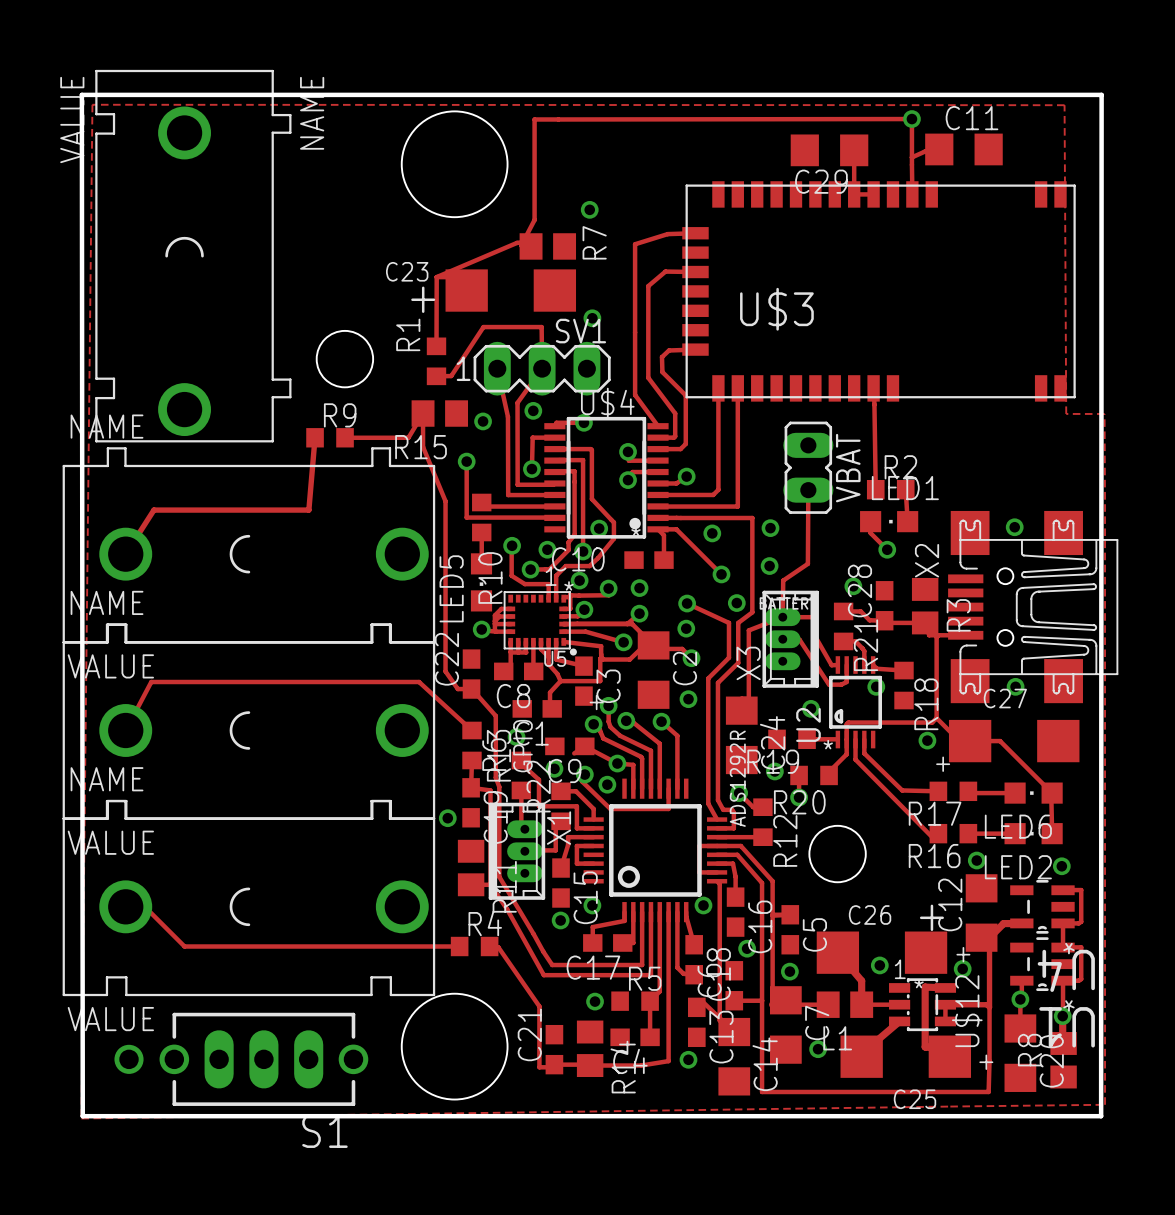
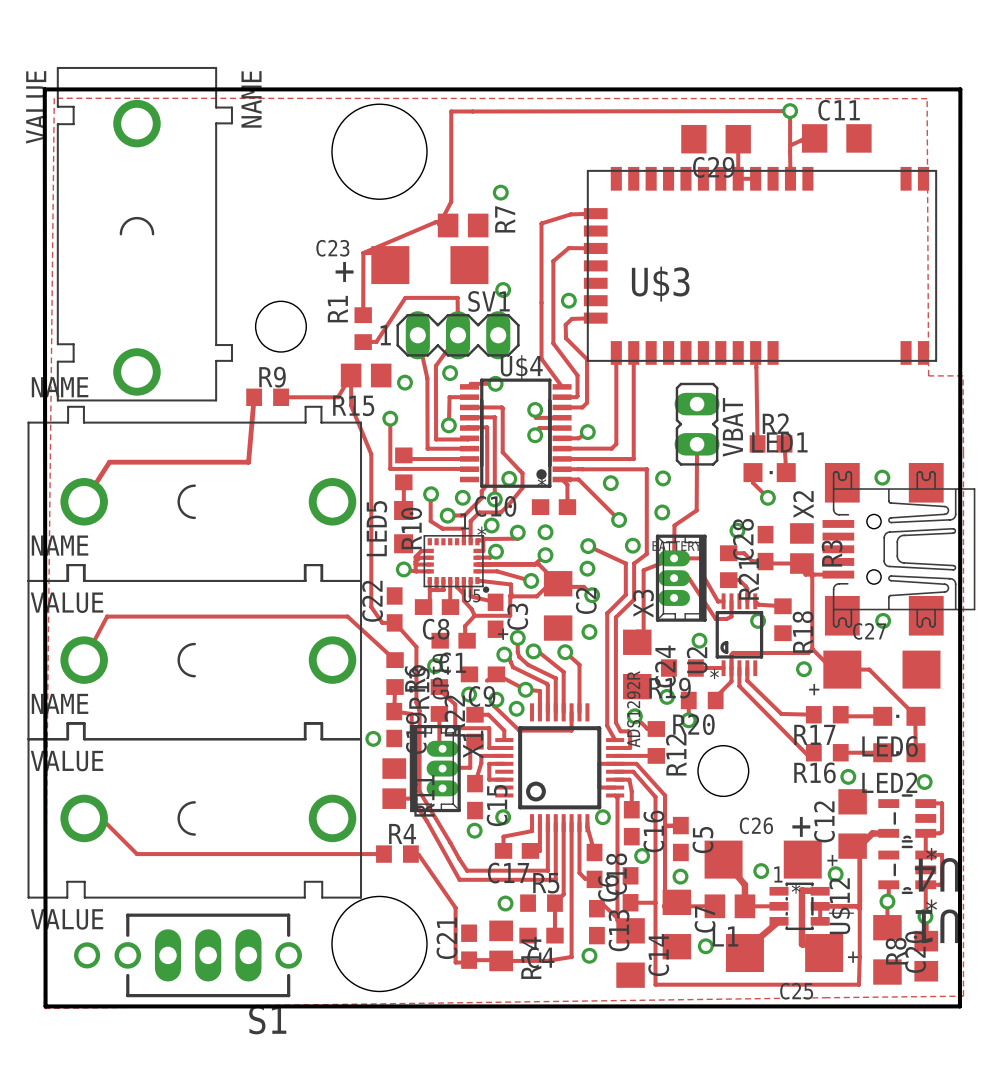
via: none -> (568, 300)

